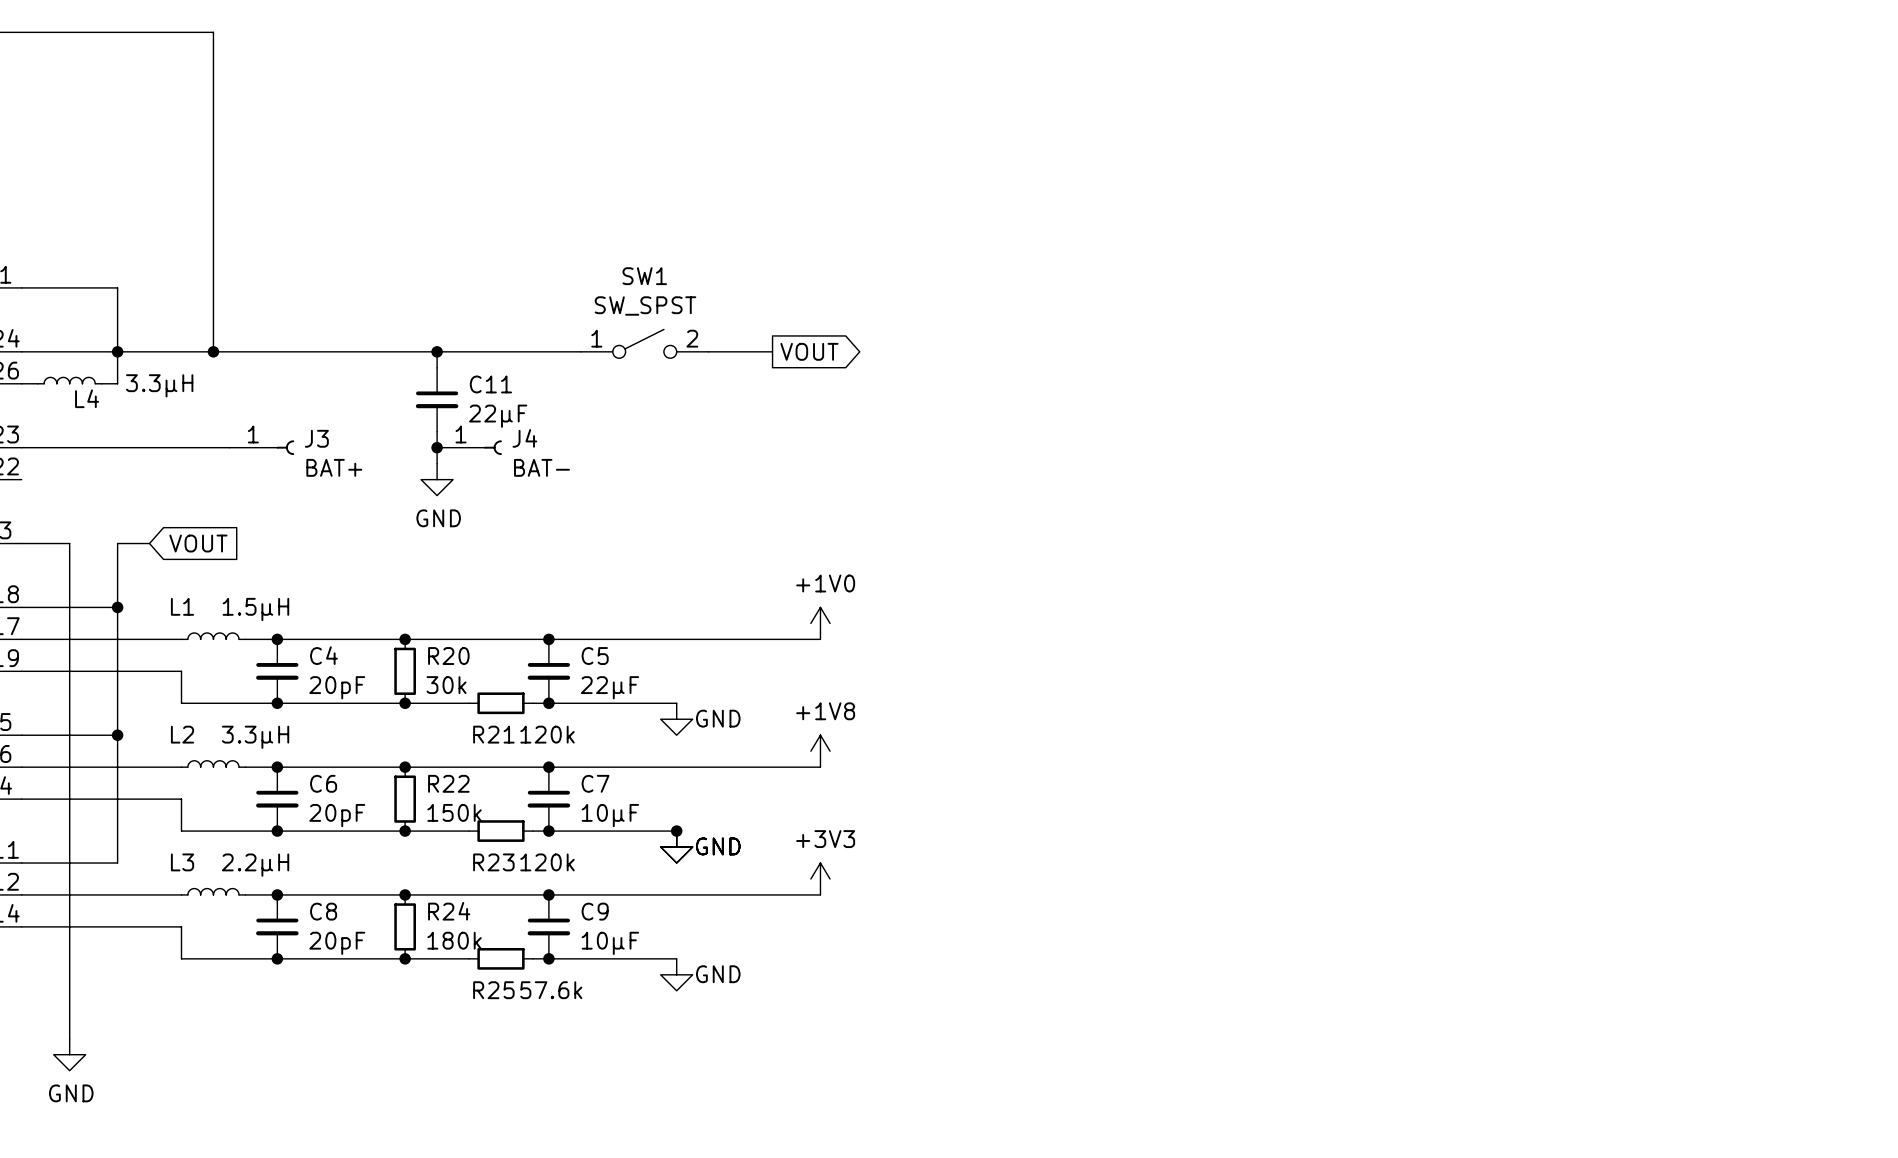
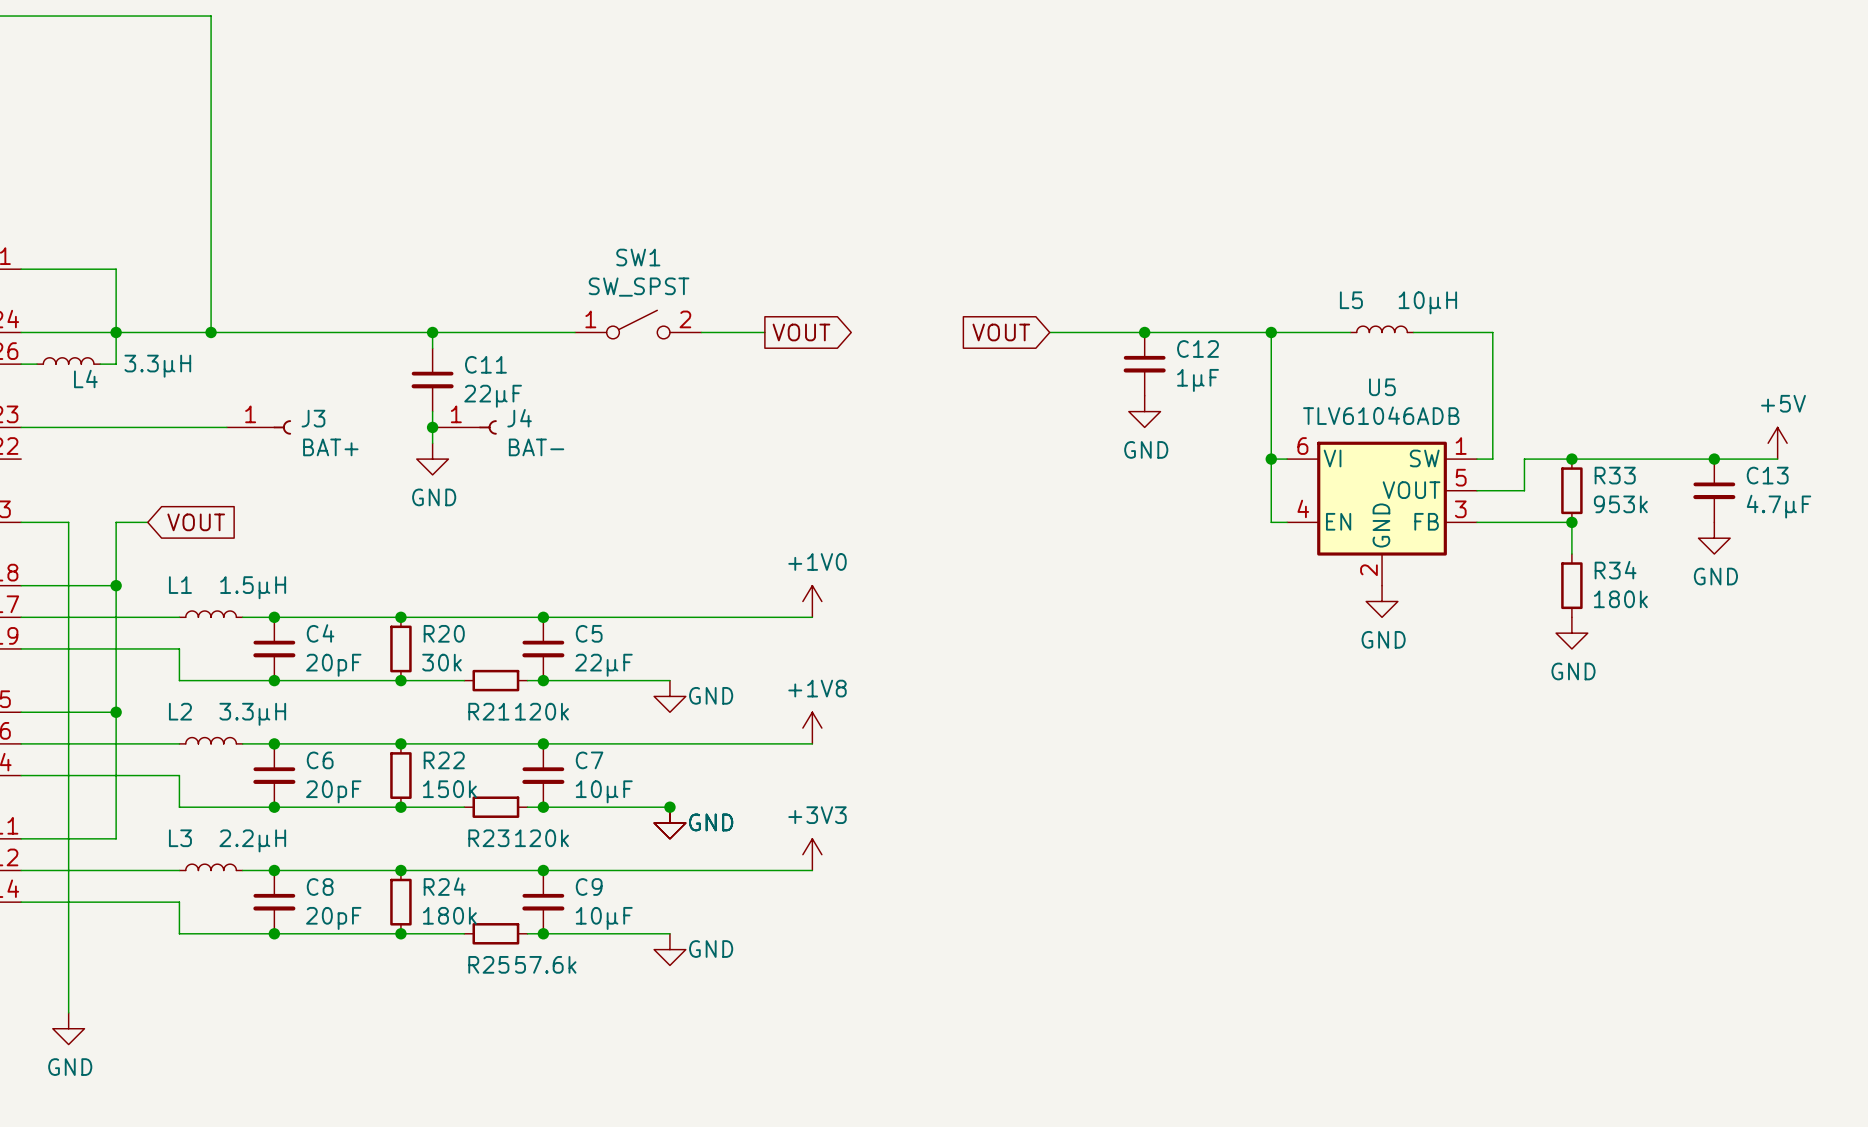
L5: none -> 10µH (1382, 329)
global label: none -> VOUT (1001, 332)
wire: none -> (1049, 332) (1350, 332)
junction: none -> (1144, 332)
wire: none -> (1271, 332) (1271, 522) (1287, 522)
junction: none -> (1271, 332)
wire: none -> (1413, 332) (1492, 332) (1492, 459) (1476, 459)
C12: none -> 1µF (1144, 364)
power symbol: none -> GND (1144, 411)
power symbol: none -> +5V (1777, 443)
wire: none -> (1271, 459) (1287, 459)
junction: none -> (1271, 459)
junction: none -> (1571, 459)
junction: none -> (1714, 459)
wire: none -> (1777, 459) (1524, 459) (1524, 490) (1476, 490)
R33: none -> 953k (1571, 490)
C13: none -> 4.7µF (1714, 490)
U5: none -> TLV61046ADB (1382, 513)
wire: none -> (1476, 522) (1571, 522) (1571, 554)
junction: none -> (1571, 522)
power symbol: none -> GND (1714, 538)
R34: none -> 180k (1571, 585)
power symbol: none -> GND (1382, 601)
power symbol: none -> GND (1571, 633)

